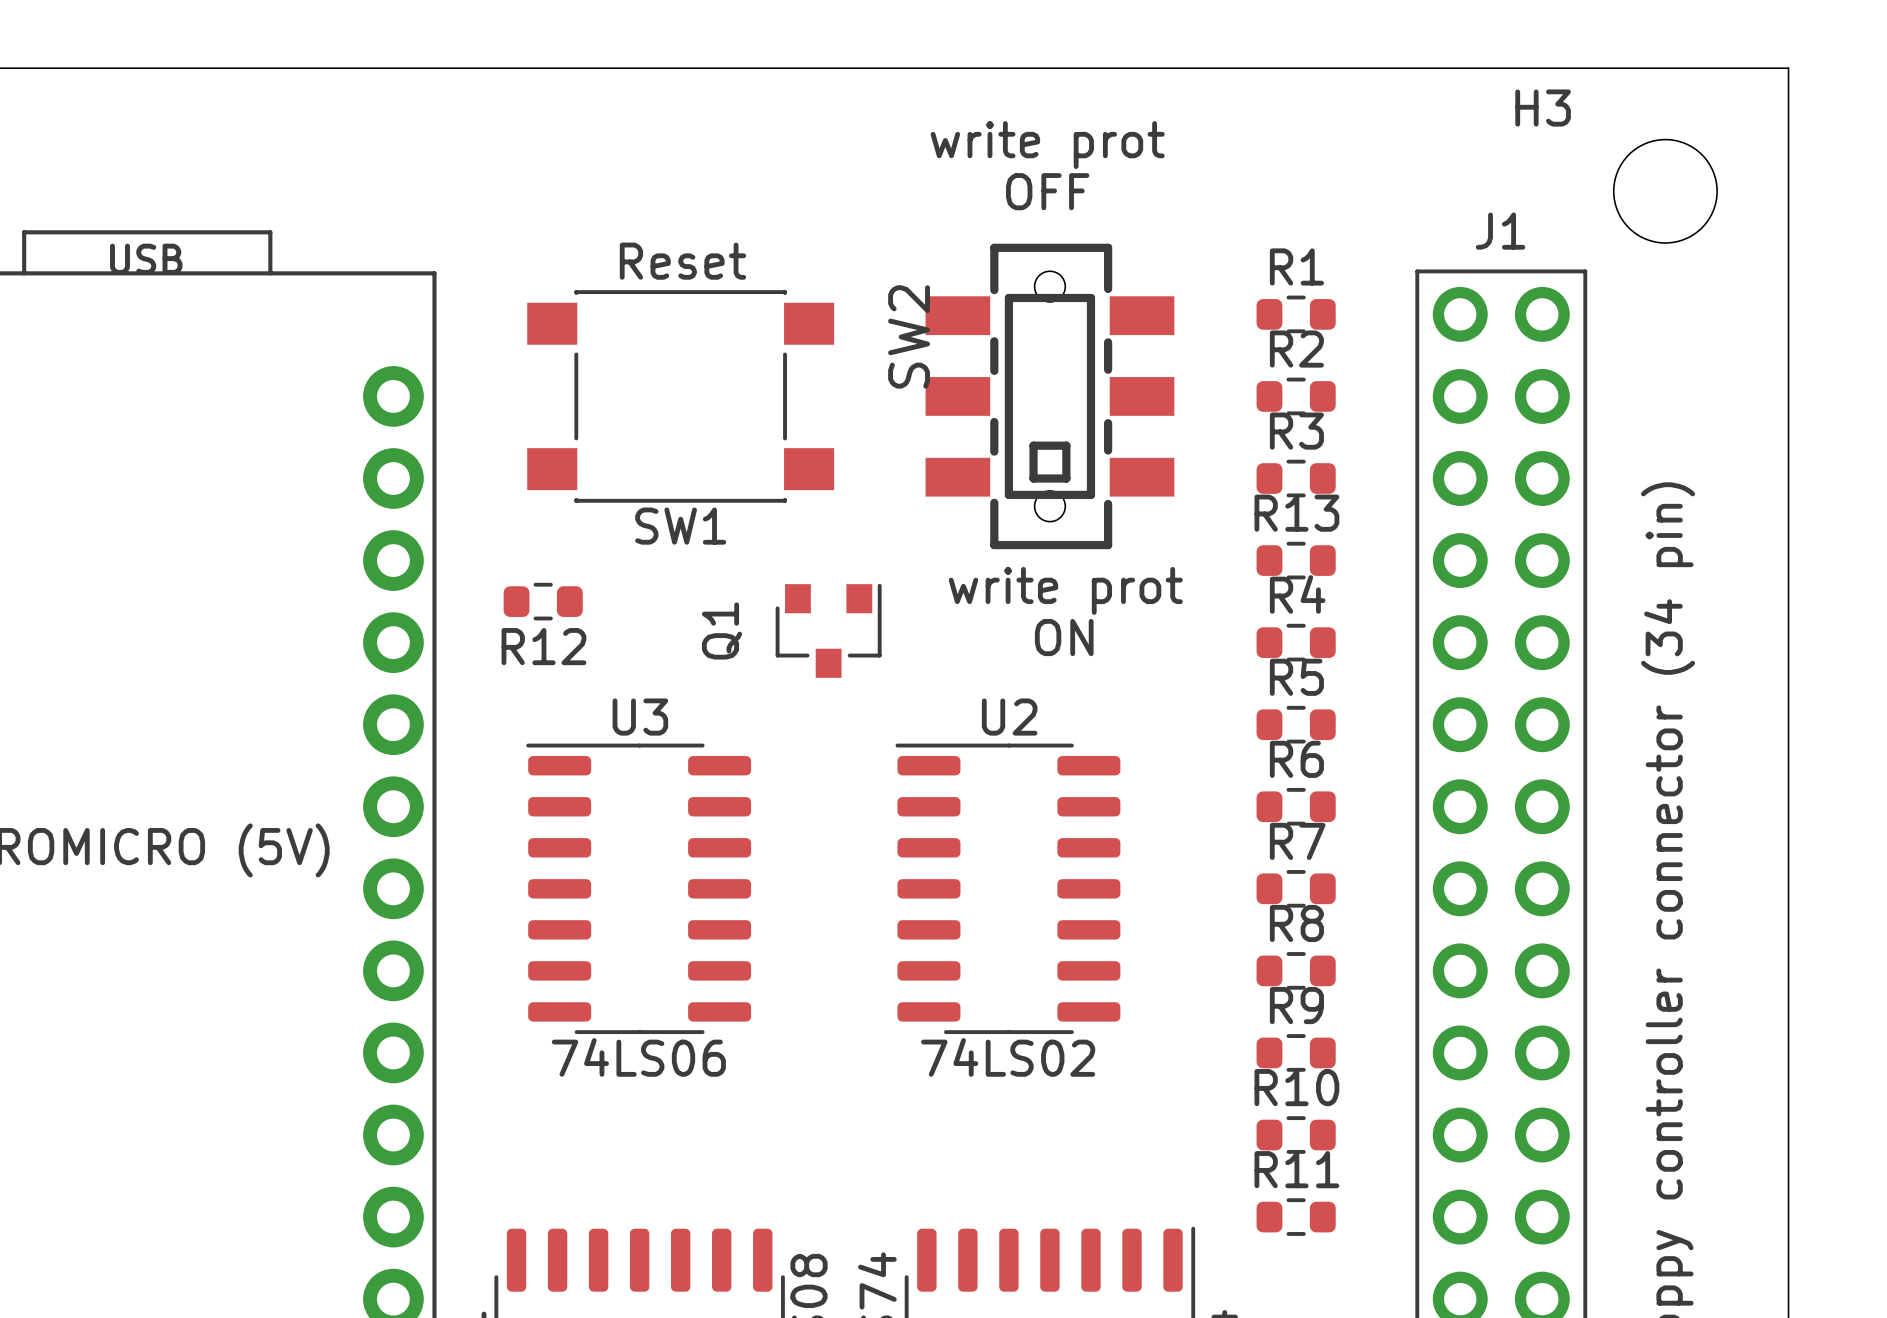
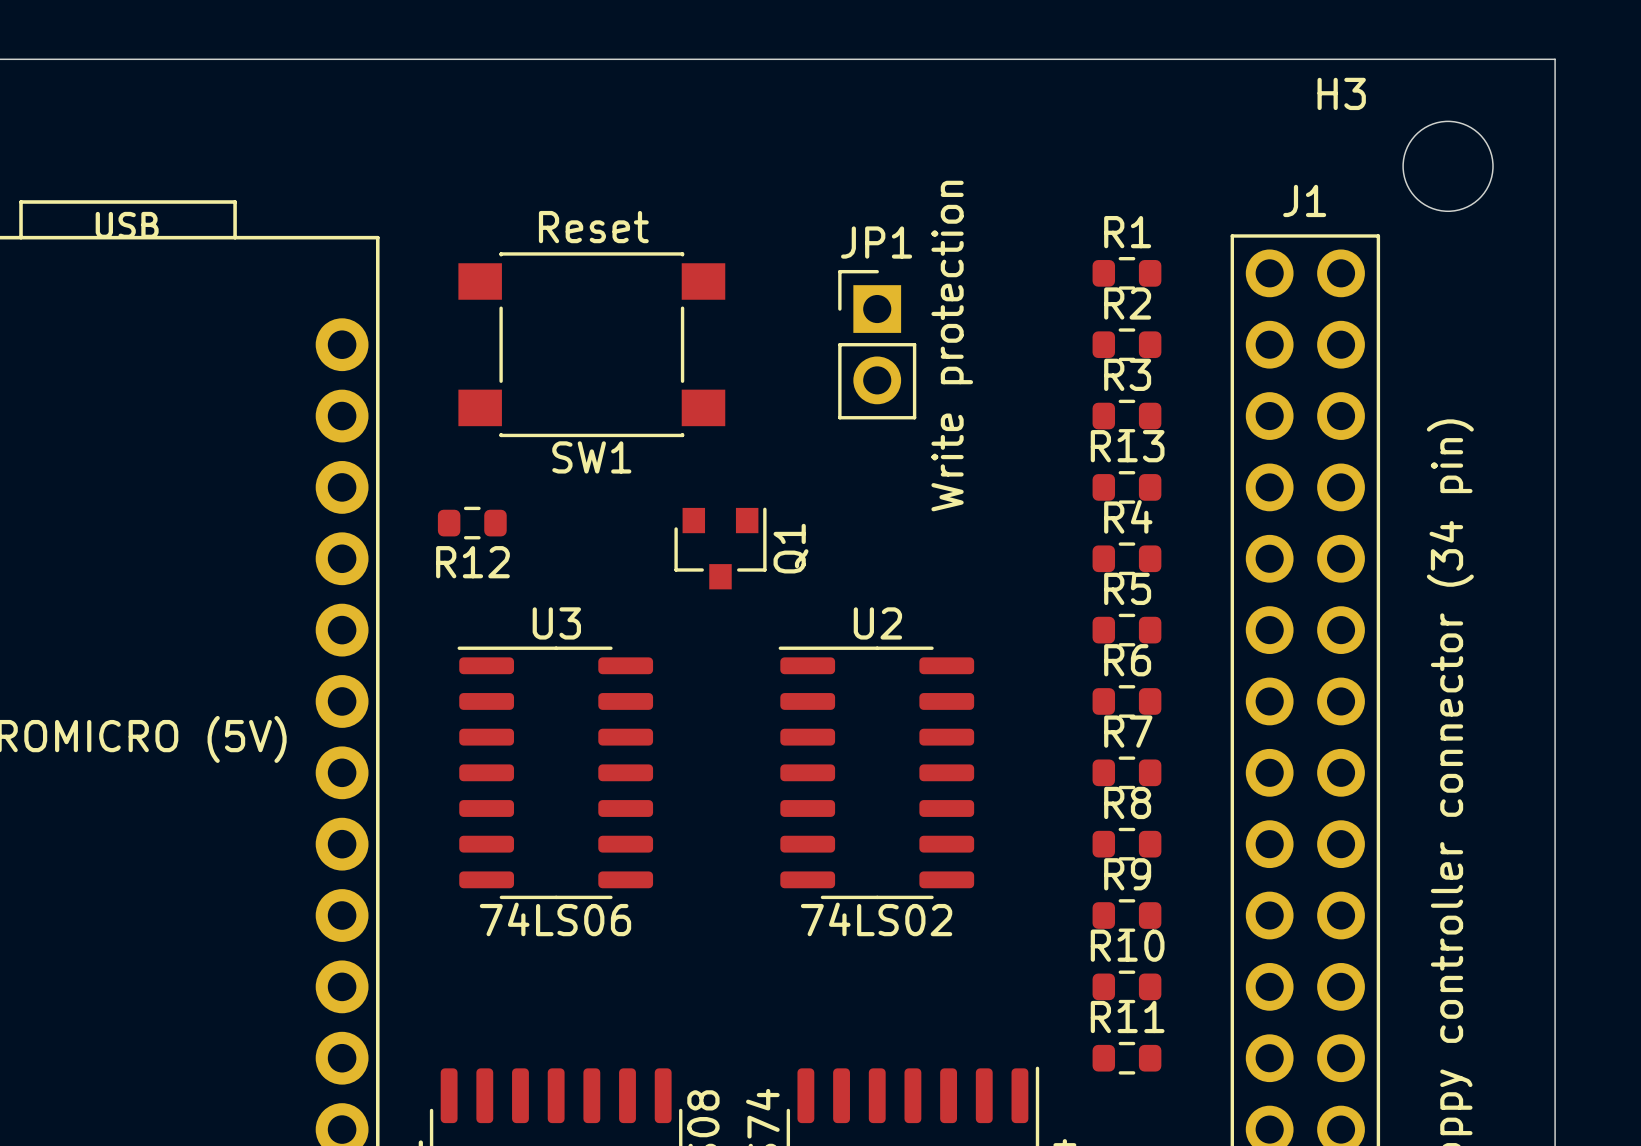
text: write prot (1047, 145) -> none
text: OFF (1047, 191) -> none
JP1: none -> Write protection (877, 344)
SW2: (1049, 396) -> none
text: write prot (1065, 590) -> none
Q1 name position: Q1 (722, 630) -> Q1 (791, 548)
text: ON (1064, 637) -> none

